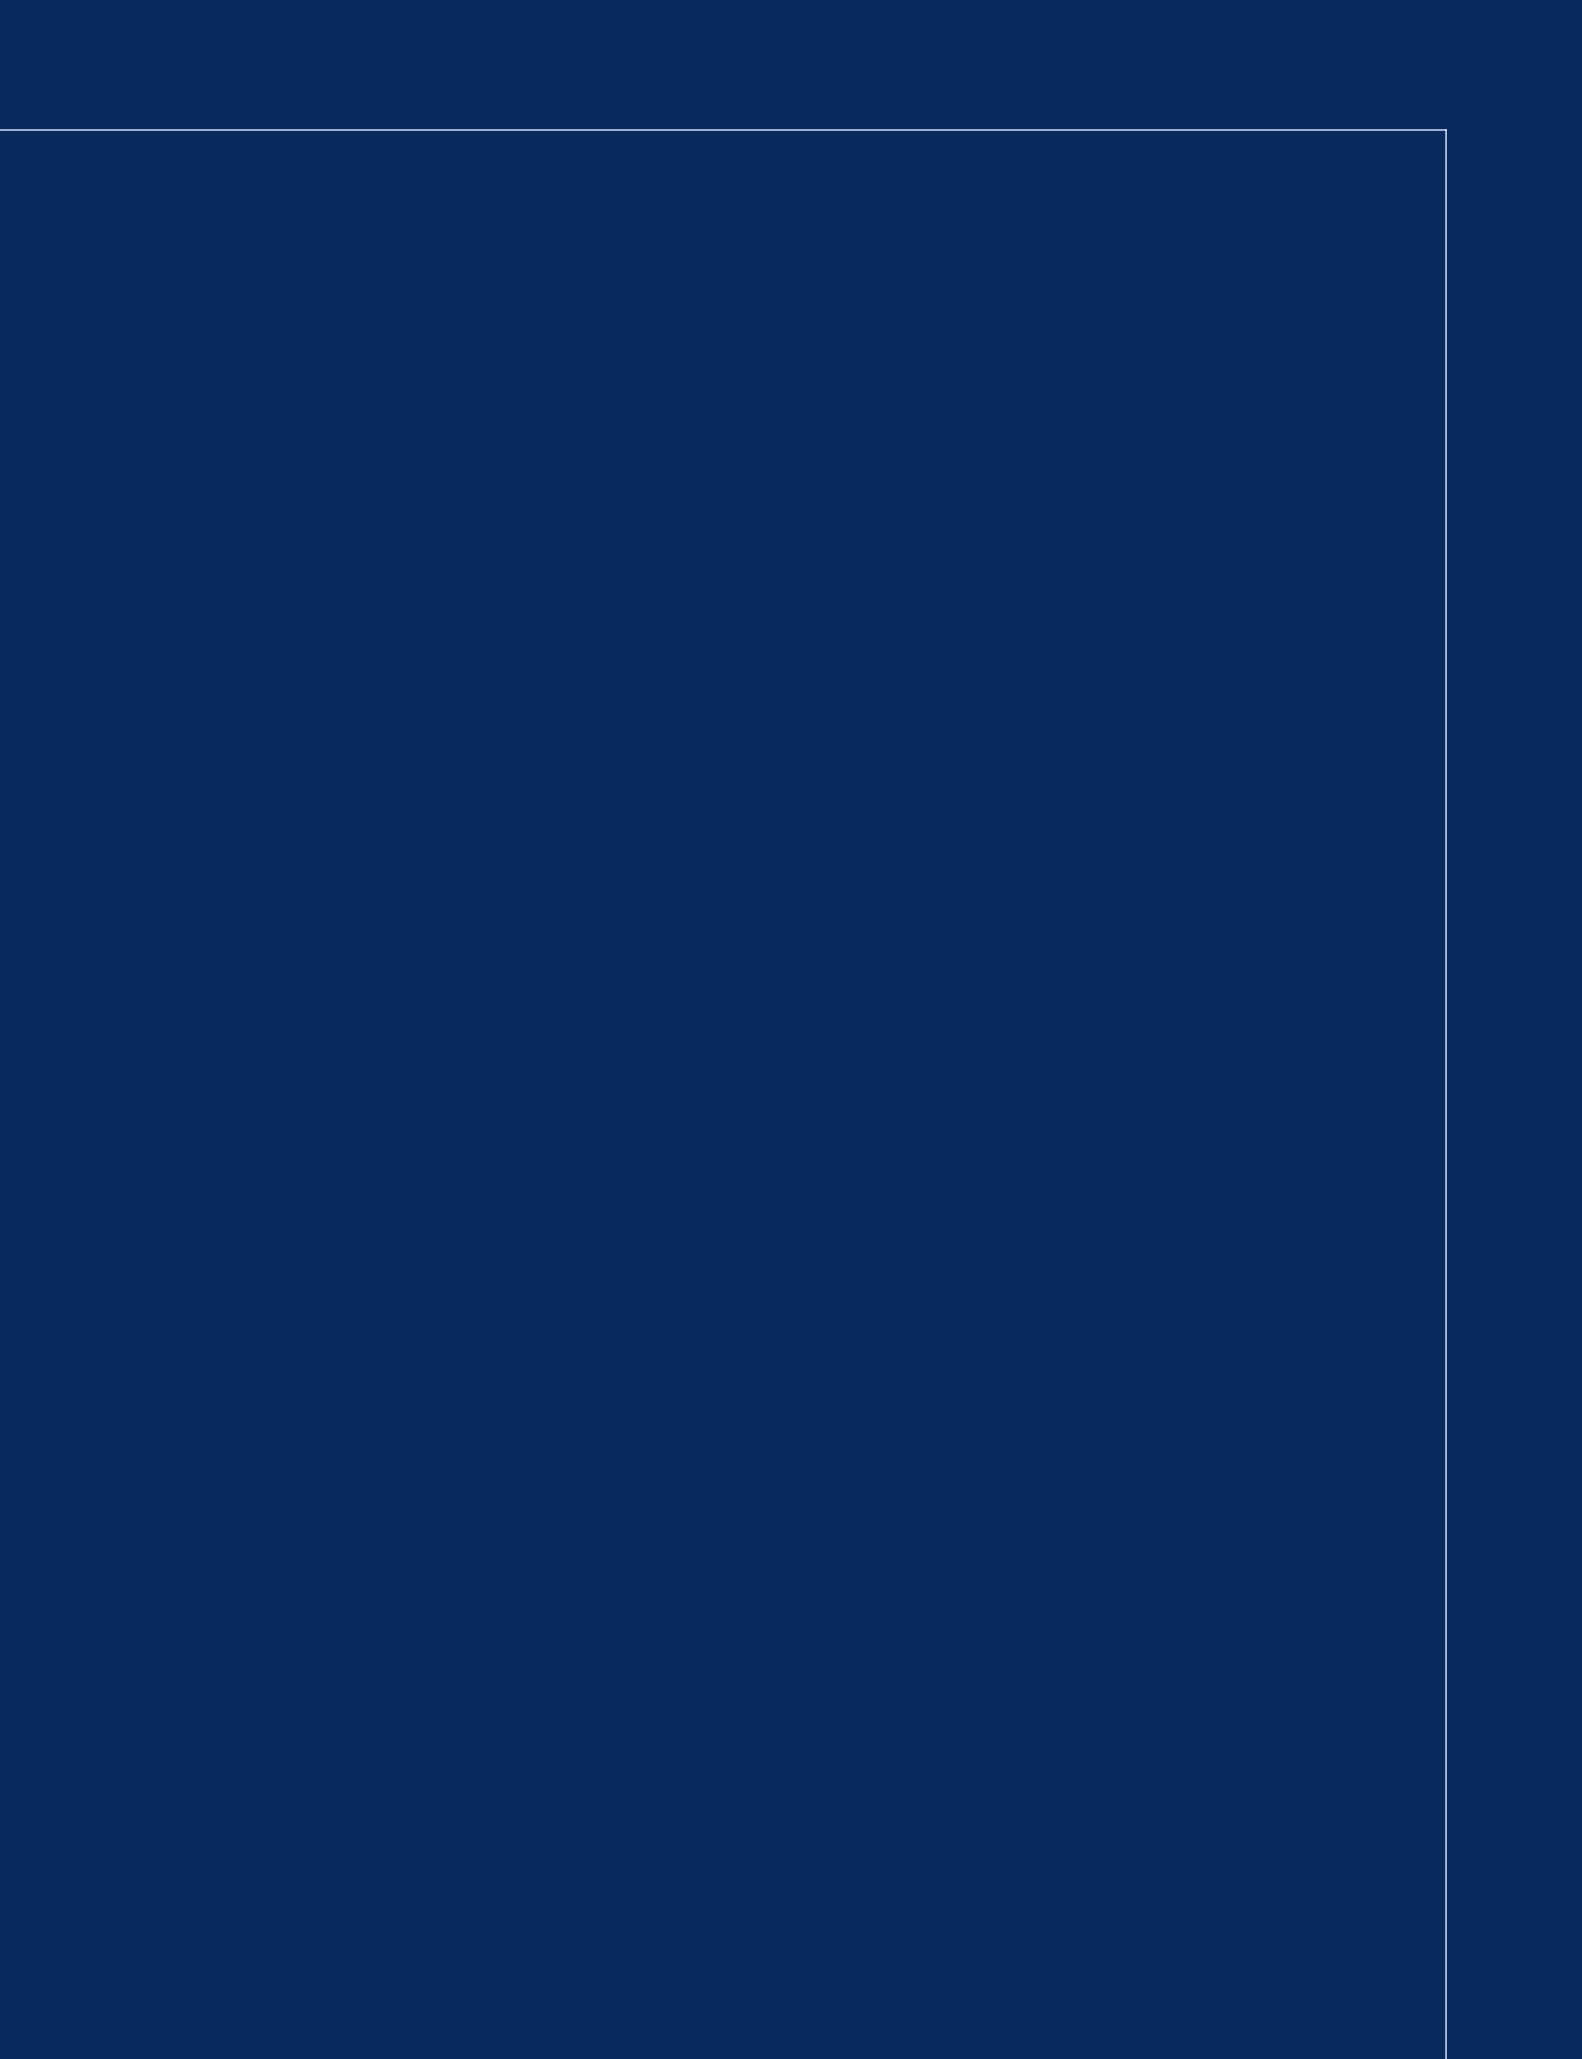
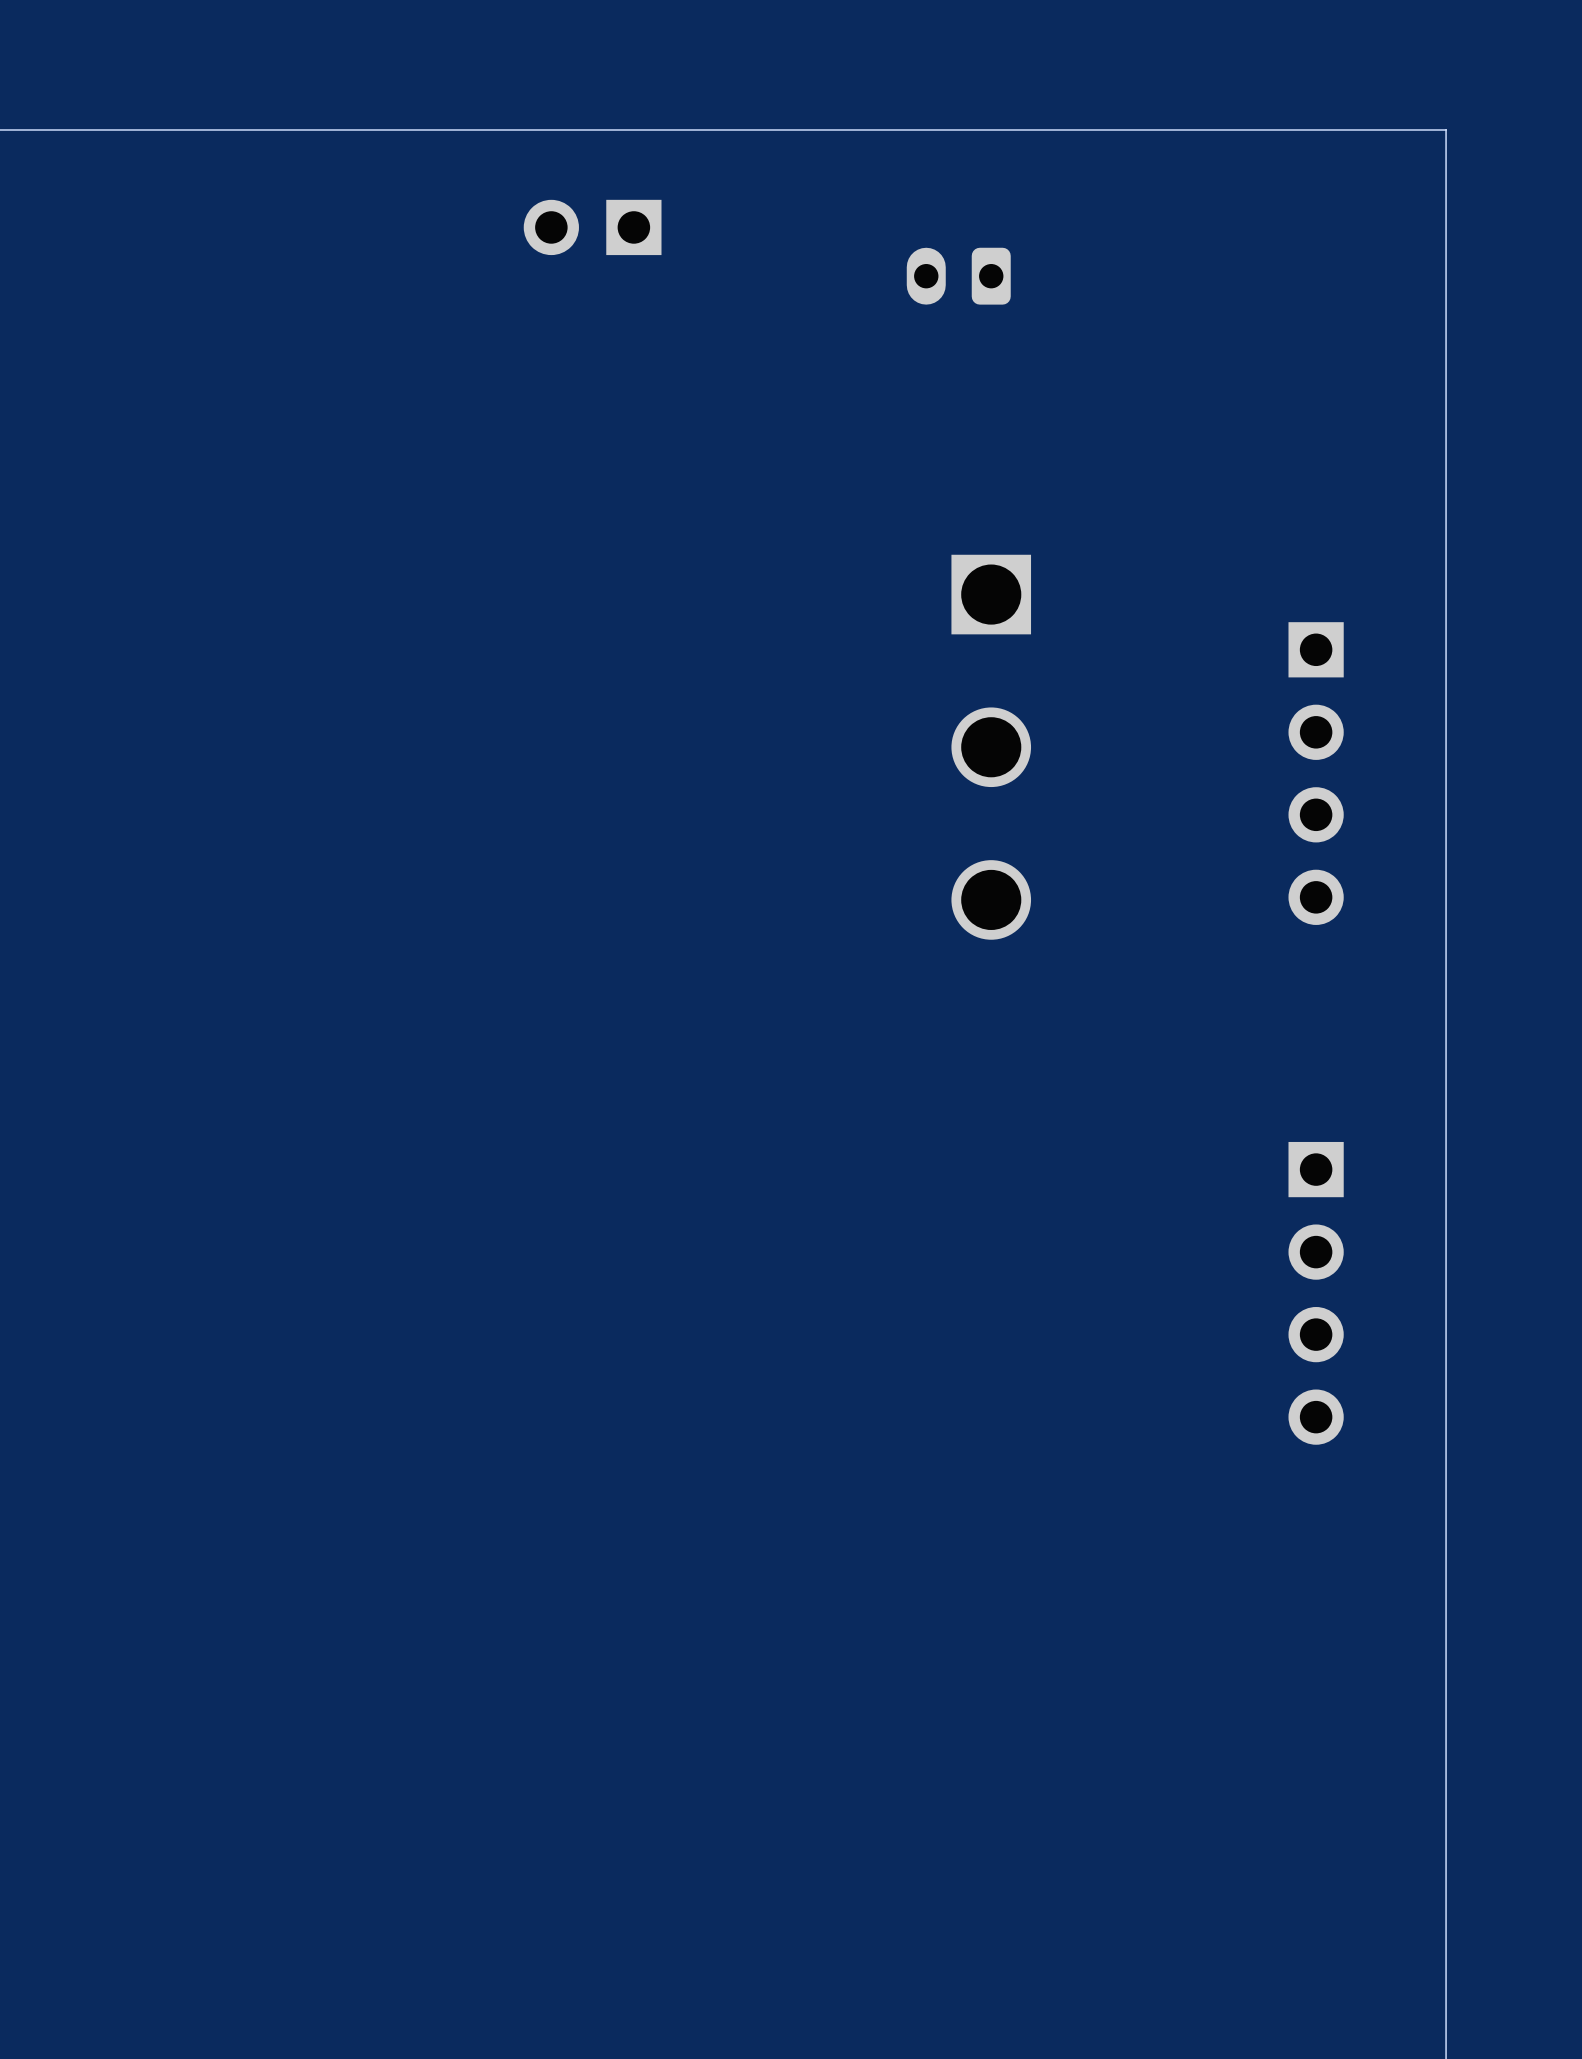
part: none -> (592, 227)
part: none -> (958, 276)
part: none -> (991, 747)
part: none -> (1316, 773)
part: none -> (1316, 1293)

